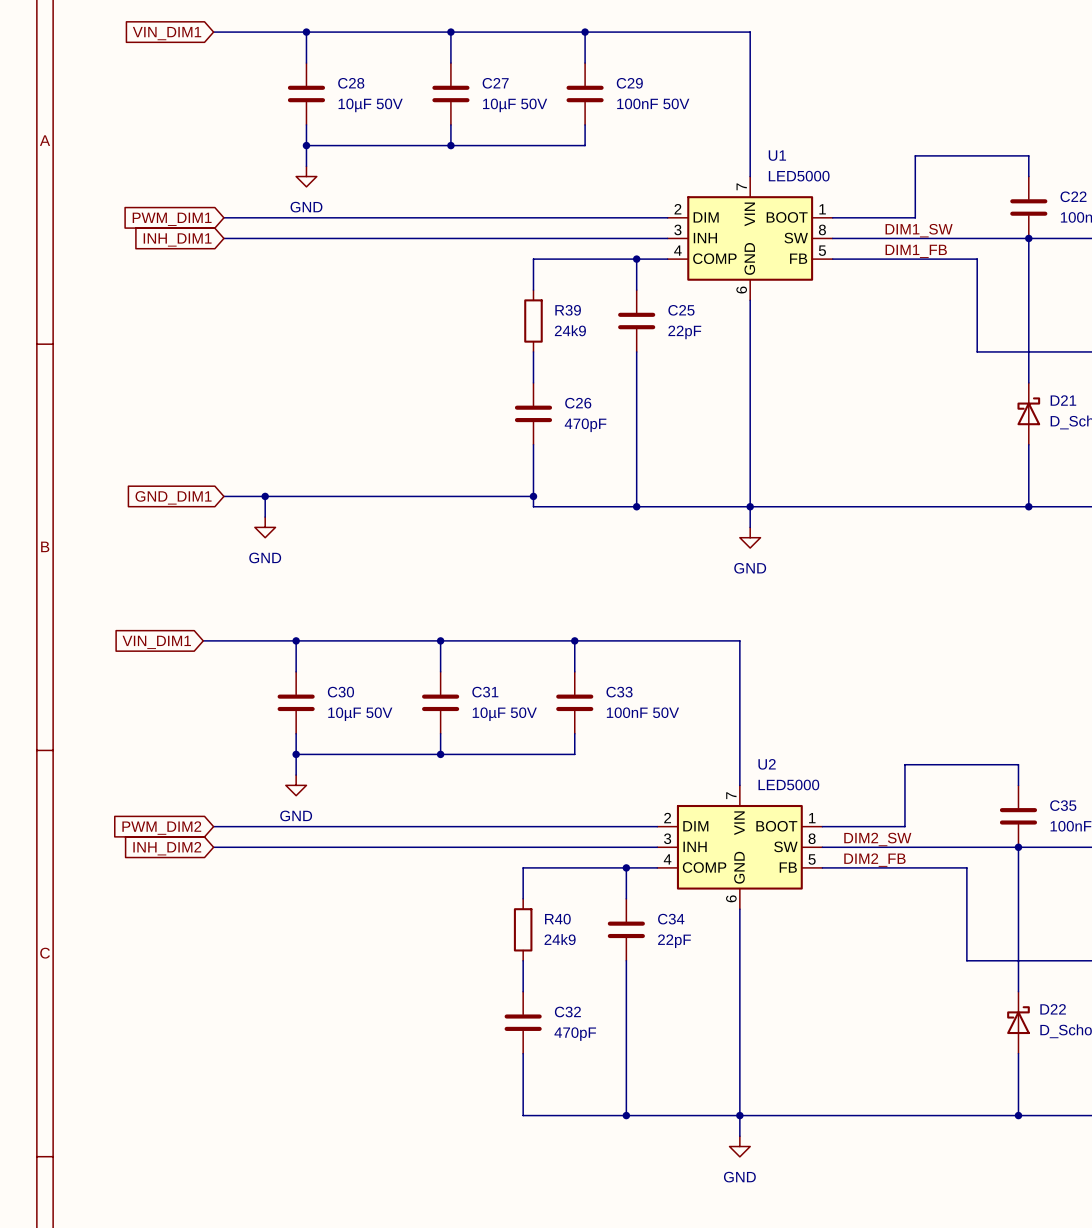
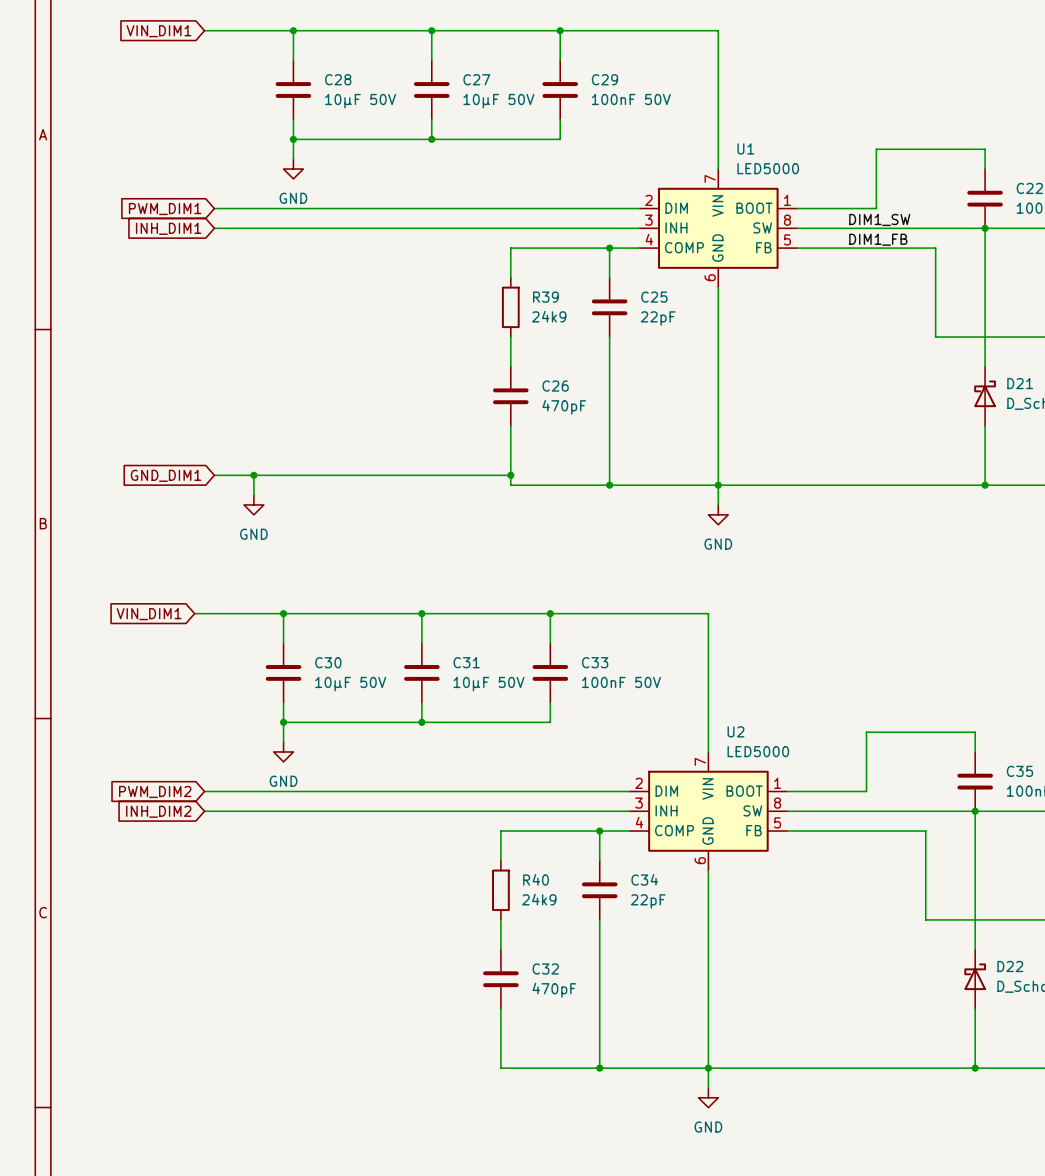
label: DIM2_SW (877, 839) -> none
label: DIM2_FB (874, 860) -> none

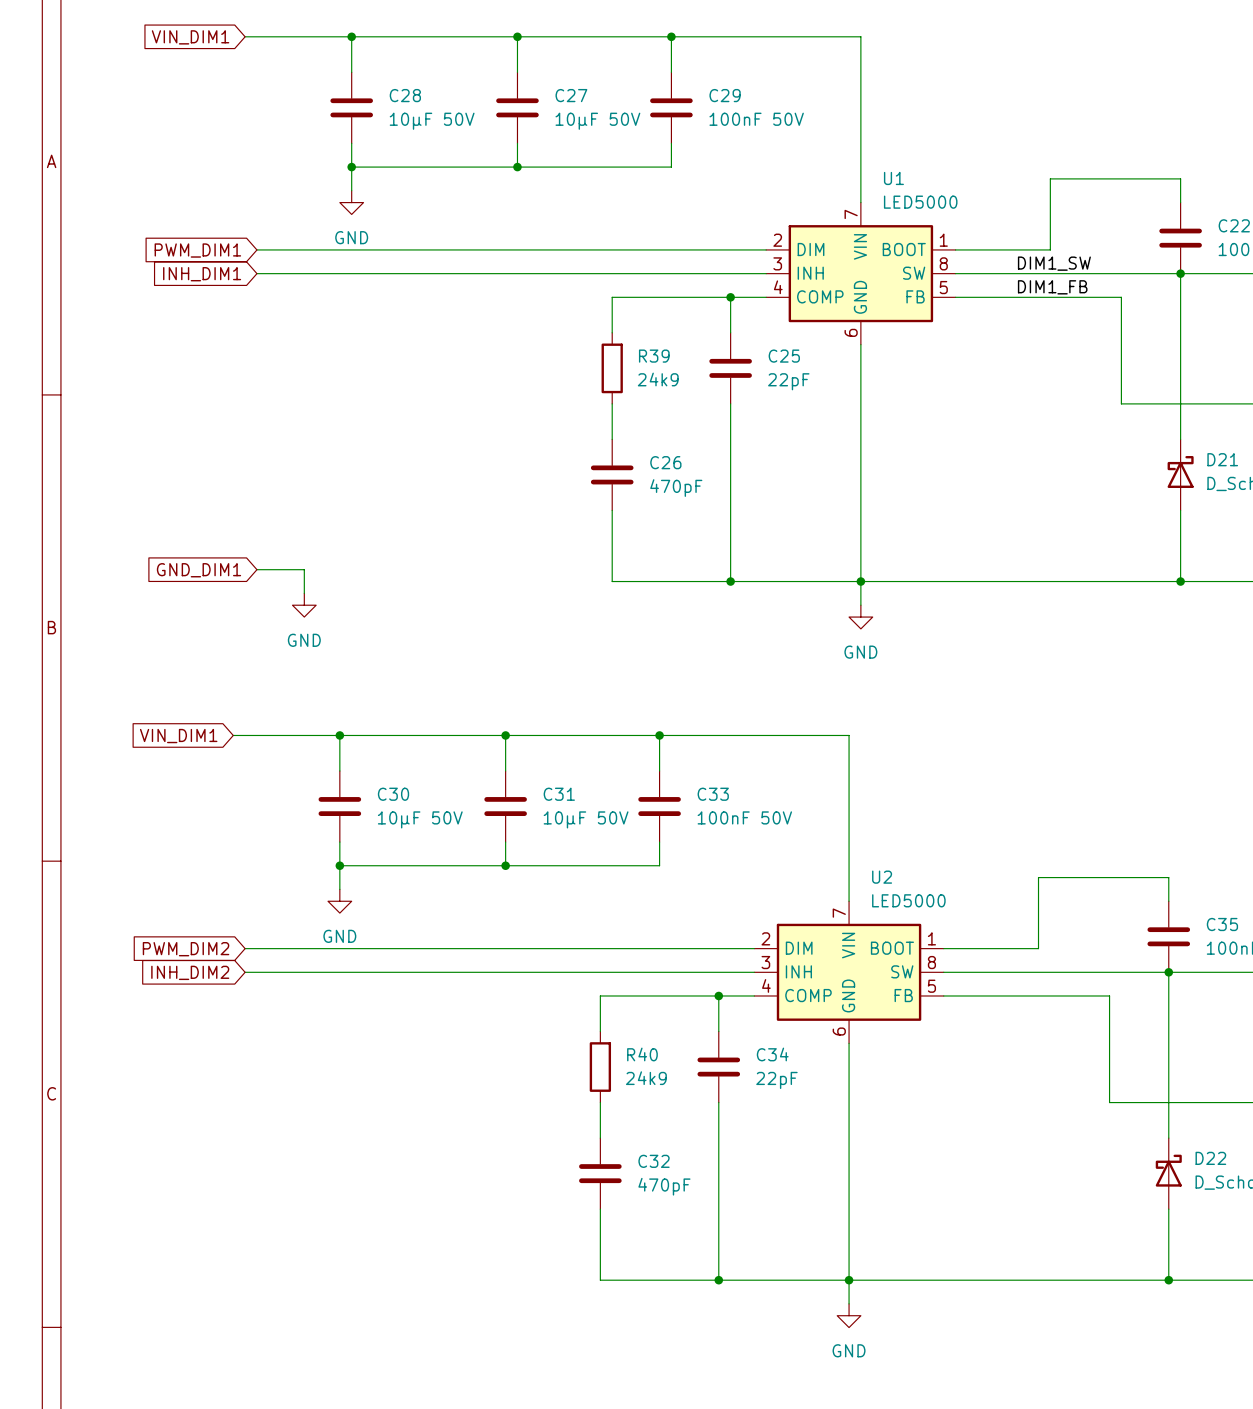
wire: (253, 475) (510, 475) -> none
junction: (253, 475) -> none
junction: (510, 475) -> none

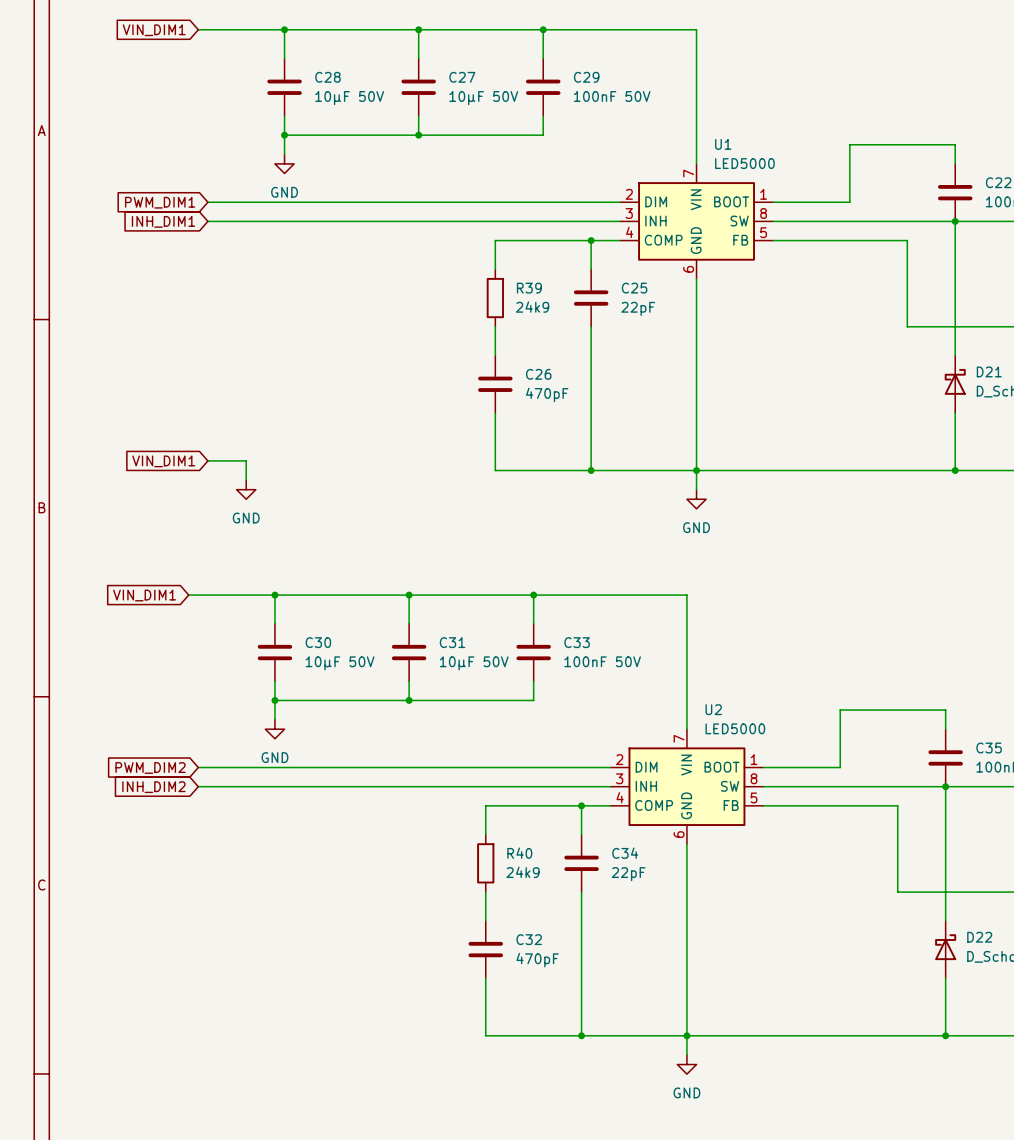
label: DIM1_SW (1054, 263) -> none
label: DIM1_FB (1052, 287) -> none
global label: GND_DIM1 (198, 570) -> VIN_DIM1 (163, 461)

